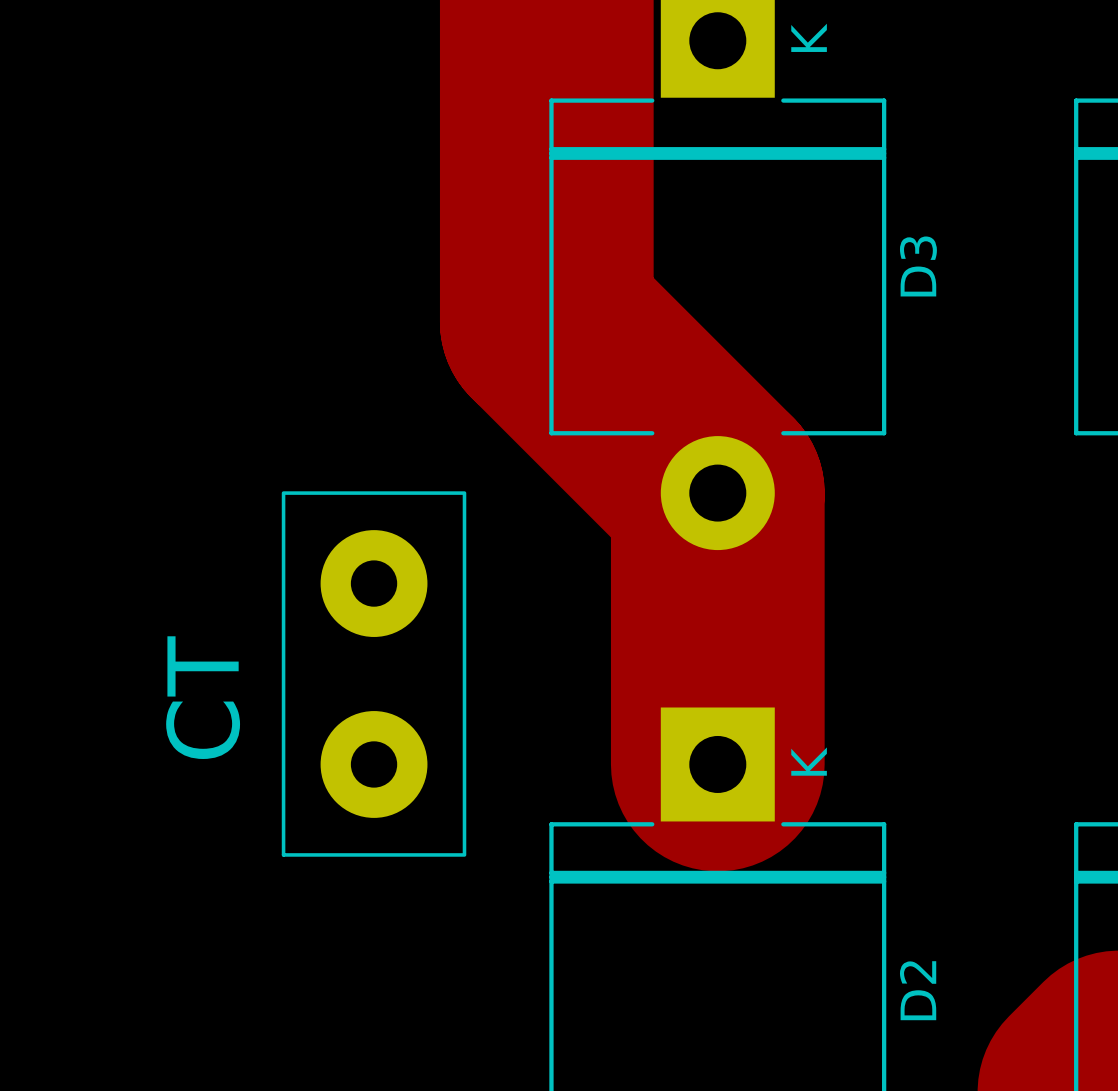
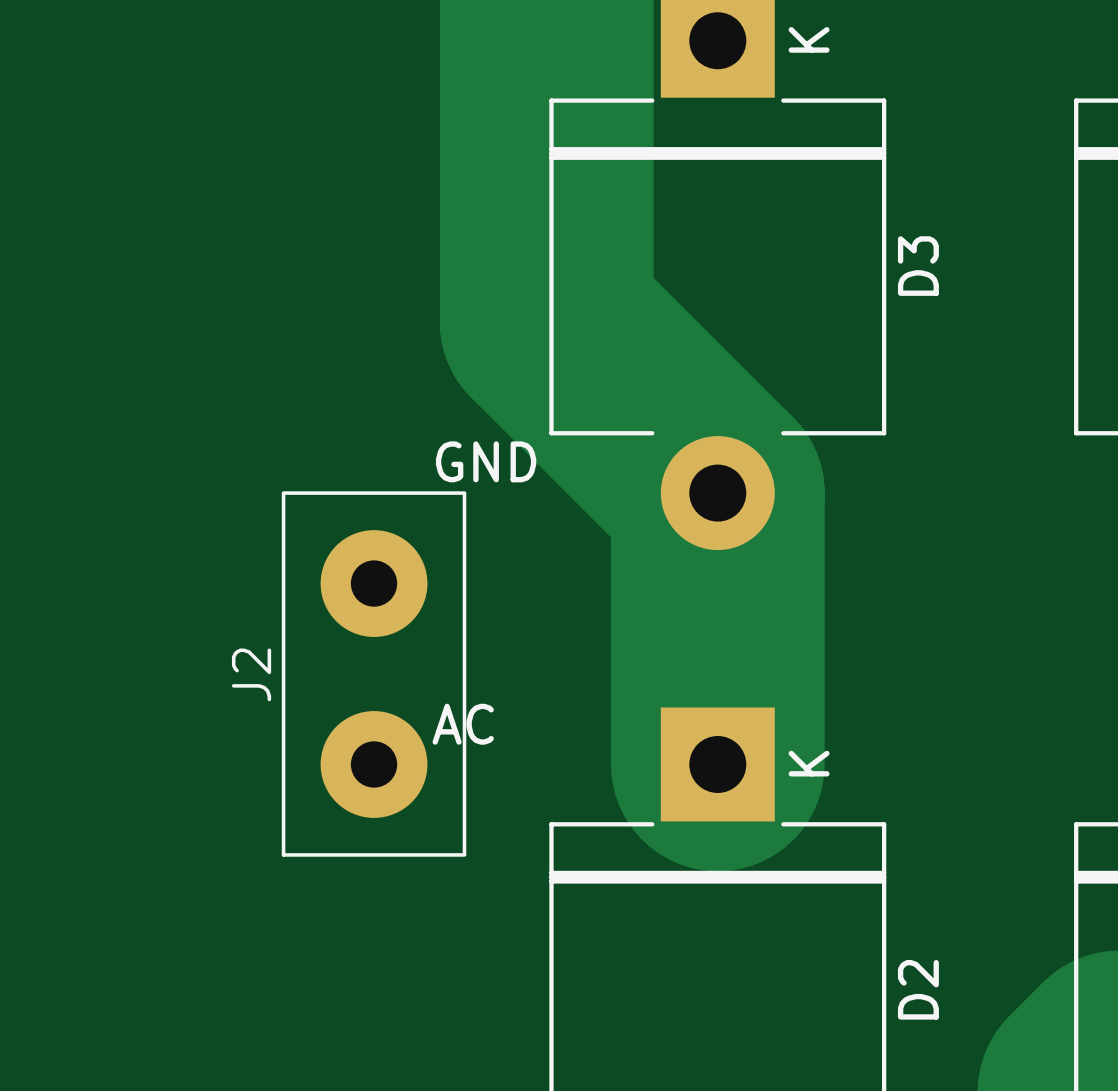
text: none -> GND (486, 461)
J2 name: none -> J2 (251, 674)
text: CT (203, 697) -> none
text: none -> AC (463, 724)

